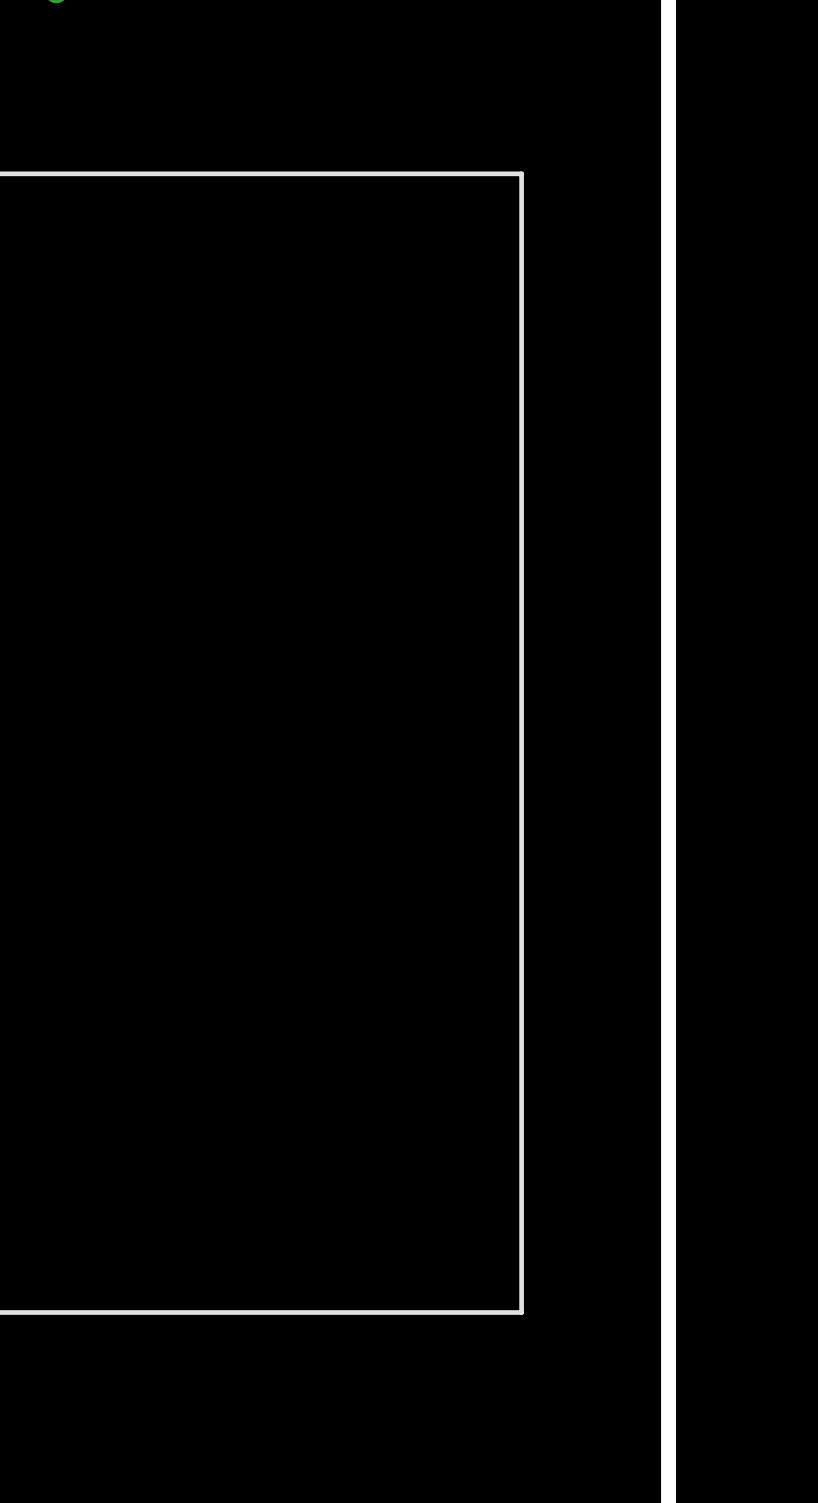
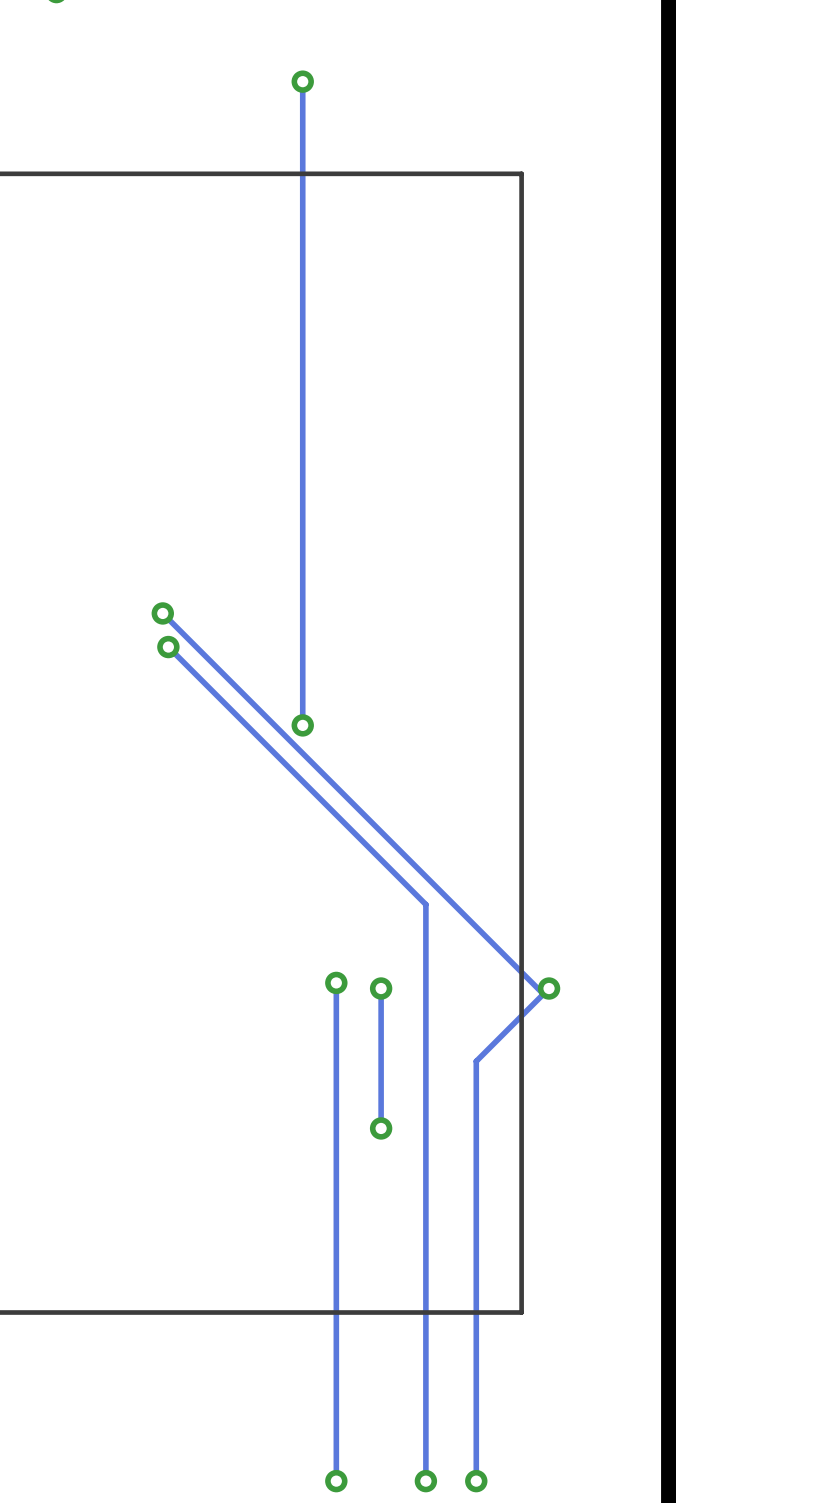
track: none -> (302, 81) (302, 725)
via: none -> (302, 81)
track: none -> (162, 613) (543, 994)
via: none -> (162, 613)
track: none -> (168, 647) (425, 904) (425, 1481)
via: none -> (168, 647)
via: none -> (302, 725)
track: none -> (336, 982) (336, 1481)
via: none -> (336, 982)
track: none -> (381, 988) (381, 1128)
via: none -> (381, 988)
track: none -> (549, 988) (476, 1061) (476, 1481)
via: none -> (549, 988)
via: none -> (381, 1128)
via: none -> (336, 1481)
via: none -> (425, 1481)
via: none -> (476, 1481)

